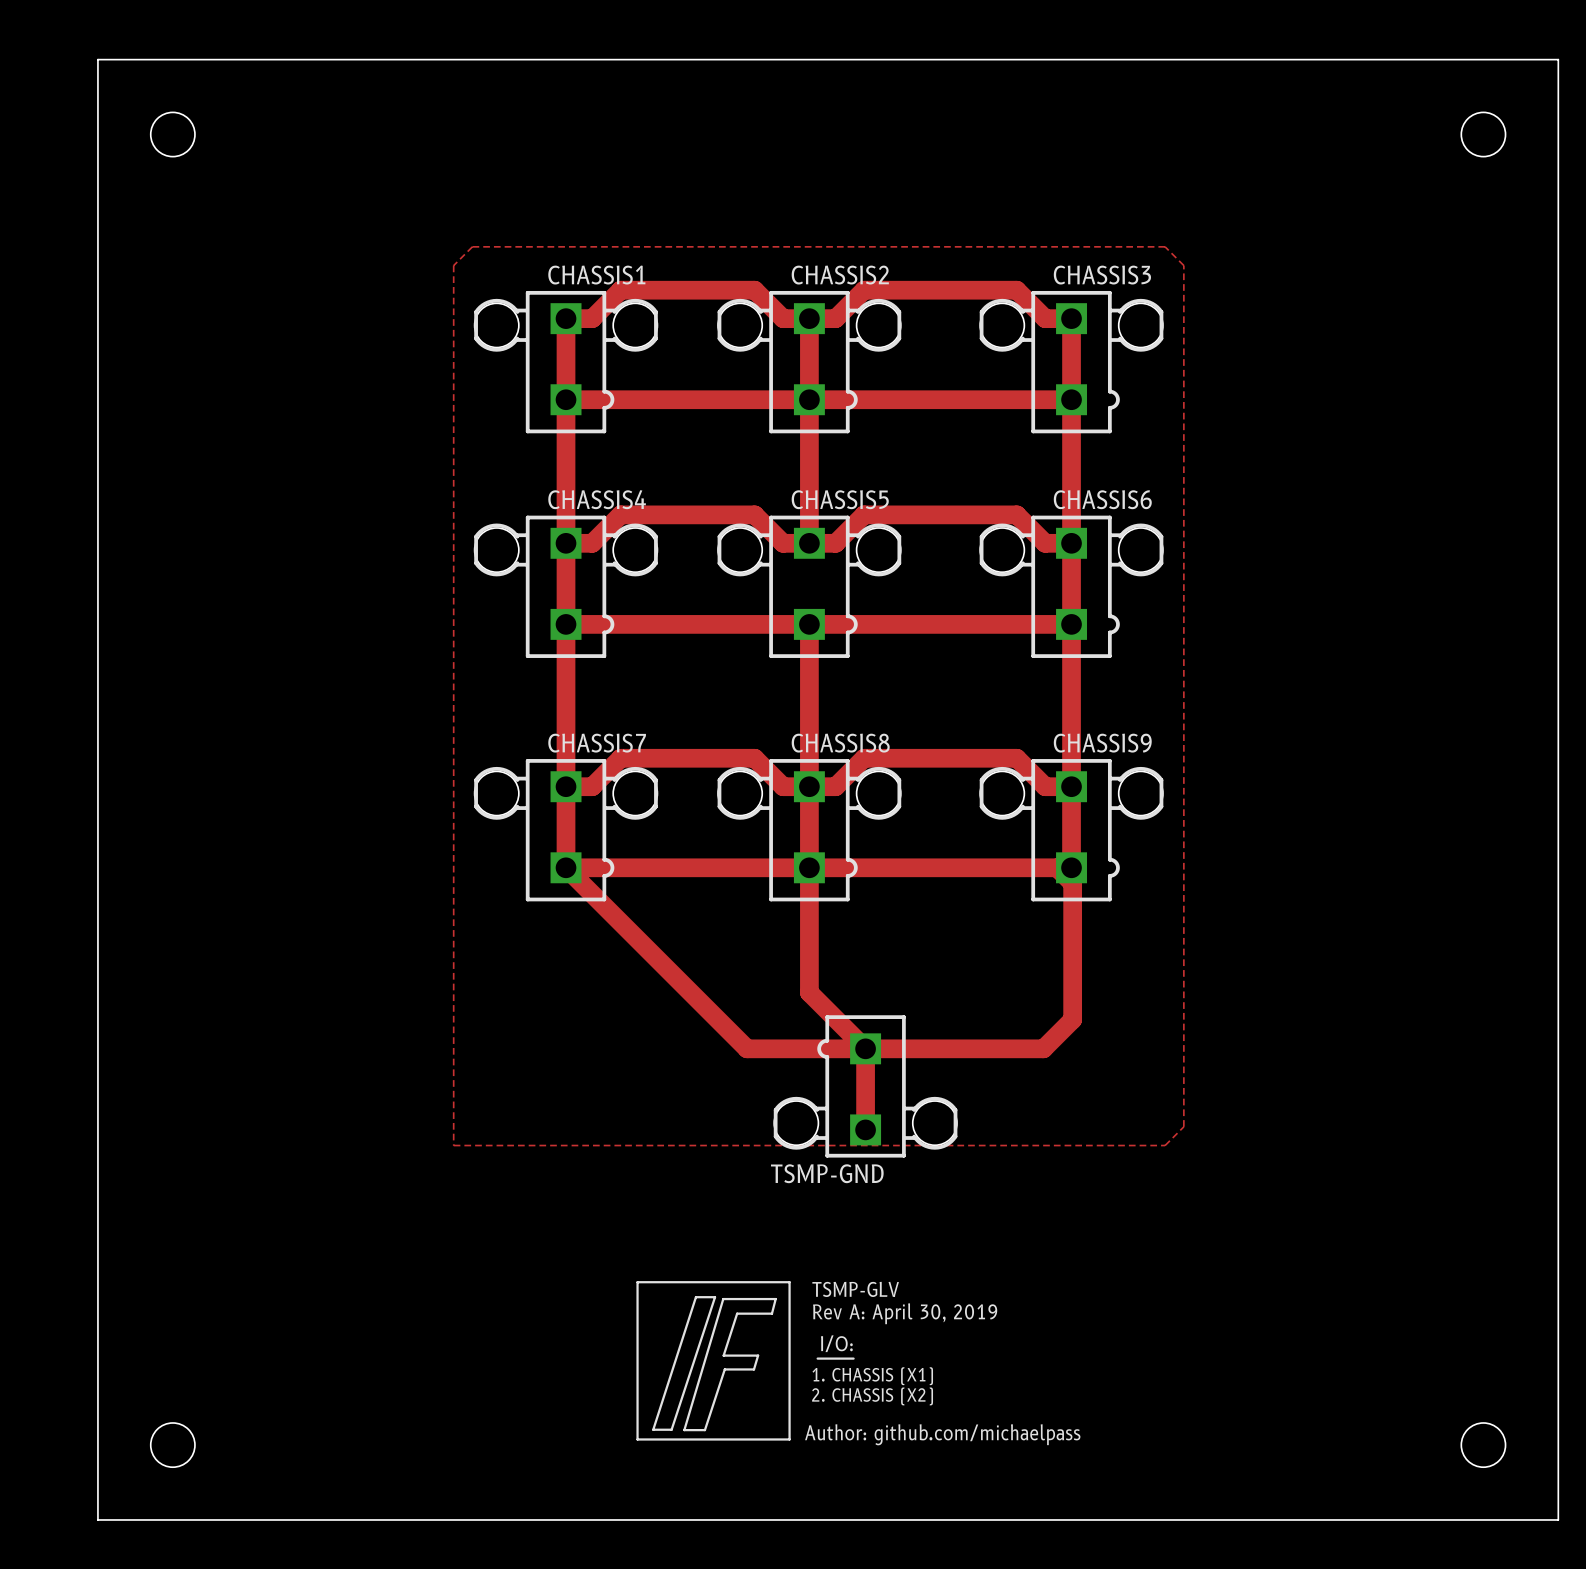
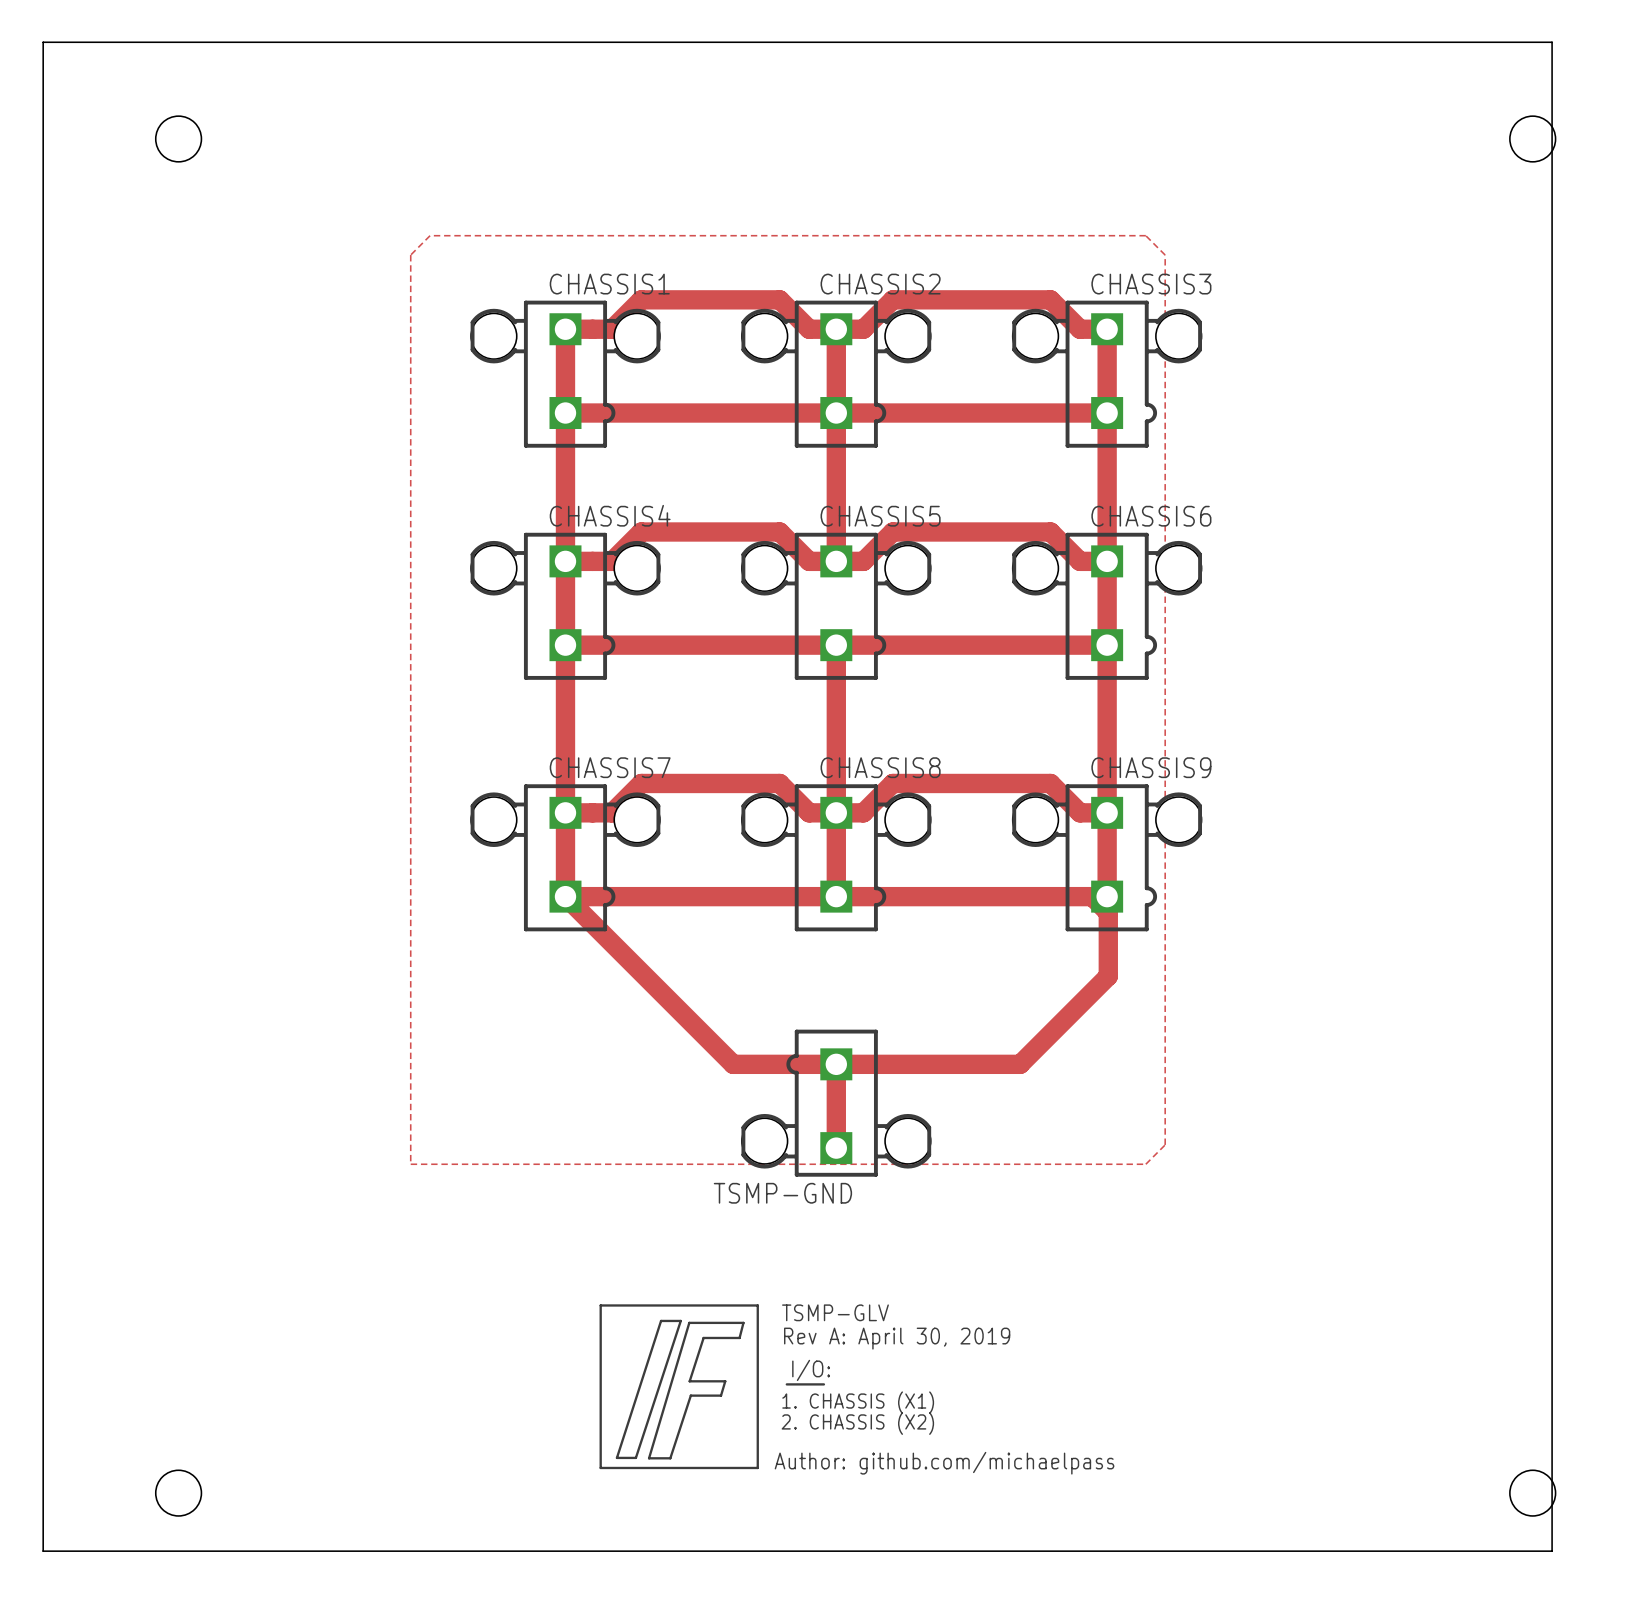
board edge: (97, 59) (1558, 59) (1558, 1519) (97, 1519) (97, 59) -> (43, 42) (1552, 42) (1552, 1551) (43, 1551) (43, 42)
top zone outline: (472, 246) (1165, 246) (1183, 265) (1183, 1126) (1165, 1145) (453, 1145) (453, 265) (472, 246) -> (430, 235) (1145, 235) (1165, 255) (1165, 1144) (1145, 1164) (410, 1164) (410, 255) (430, 235)
top track: (566, 318) (566, 867) (747, 1048) (1043, 1048) (1072, 1019) (1072, 944) -> (584, 329) (565, 329) (565, 896)
CHASSIS1 position: (566, 362) -> (565, 374)
CHASSIS4 position: (566, 586) -> (565, 606)
CHASSIS7 position: (566, 830) -> (565, 857)
top track: none -> (565, 896) (733, 1064) (1020, 1064) (1108, 976)
top track: (809, 867) (809, 992) (865, 1048) (865, 1129) -> none
top track: none -> (836, 1064) (836, 1148)
TSMP-GND position: (865, 1086) -> (836, 1103)
line: (637, 1282) (637, 1439) (789, 1439) (789, 1282) (637, 1282) -> (600, 1305) (600, 1467) (757, 1467) (757, 1305) (600, 1305)
text position: TSMP-GLV (855, 1289) -> TSMP-GLV (835, 1312)
line: (695, 1297) (653, 1429) (671, 1429) (715, 1297) (695, 1297) -> (661, 1320) (616, 1457) (635, 1457) (680, 1320) (661, 1320)
line: (723, 1299) (684, 1430) (704, 1430) (724, 1369) (753, 1369) (758, 1355) (723, 1355) (737, 1313) (771, 1313) (775, 1299) (723, 1299) -> (689, 1322) (649, 1458) (670, 1458) (690, 1395) (721, 1395) (725, 1381) (689, 1381) (703, 1337) (739, 1337) (743, 1322) (689, 1322)
text position: Rev A: April 30, 2019 (905, 1313) -> Rev A: April 30, 2019 (897, 1338)
text position: I/O: (836, 1343) -> I/O: (811, 1370)
line: (817, 1358) (853, 1358) -> (786, 1384) (823, 1384)
text position: 1. CHASSIS (X1) (872, 1376) -> 1. CHASSIS (X1) (858, 1402)
text position: 2. CHASSIS (X2) (872, 1396) -> 2. CHASSIS (X2) (857, 1423)
text position: Author: github.com/michaelpass (942, 1434) -> Author: github.com/michaelpass (944, 1463)

